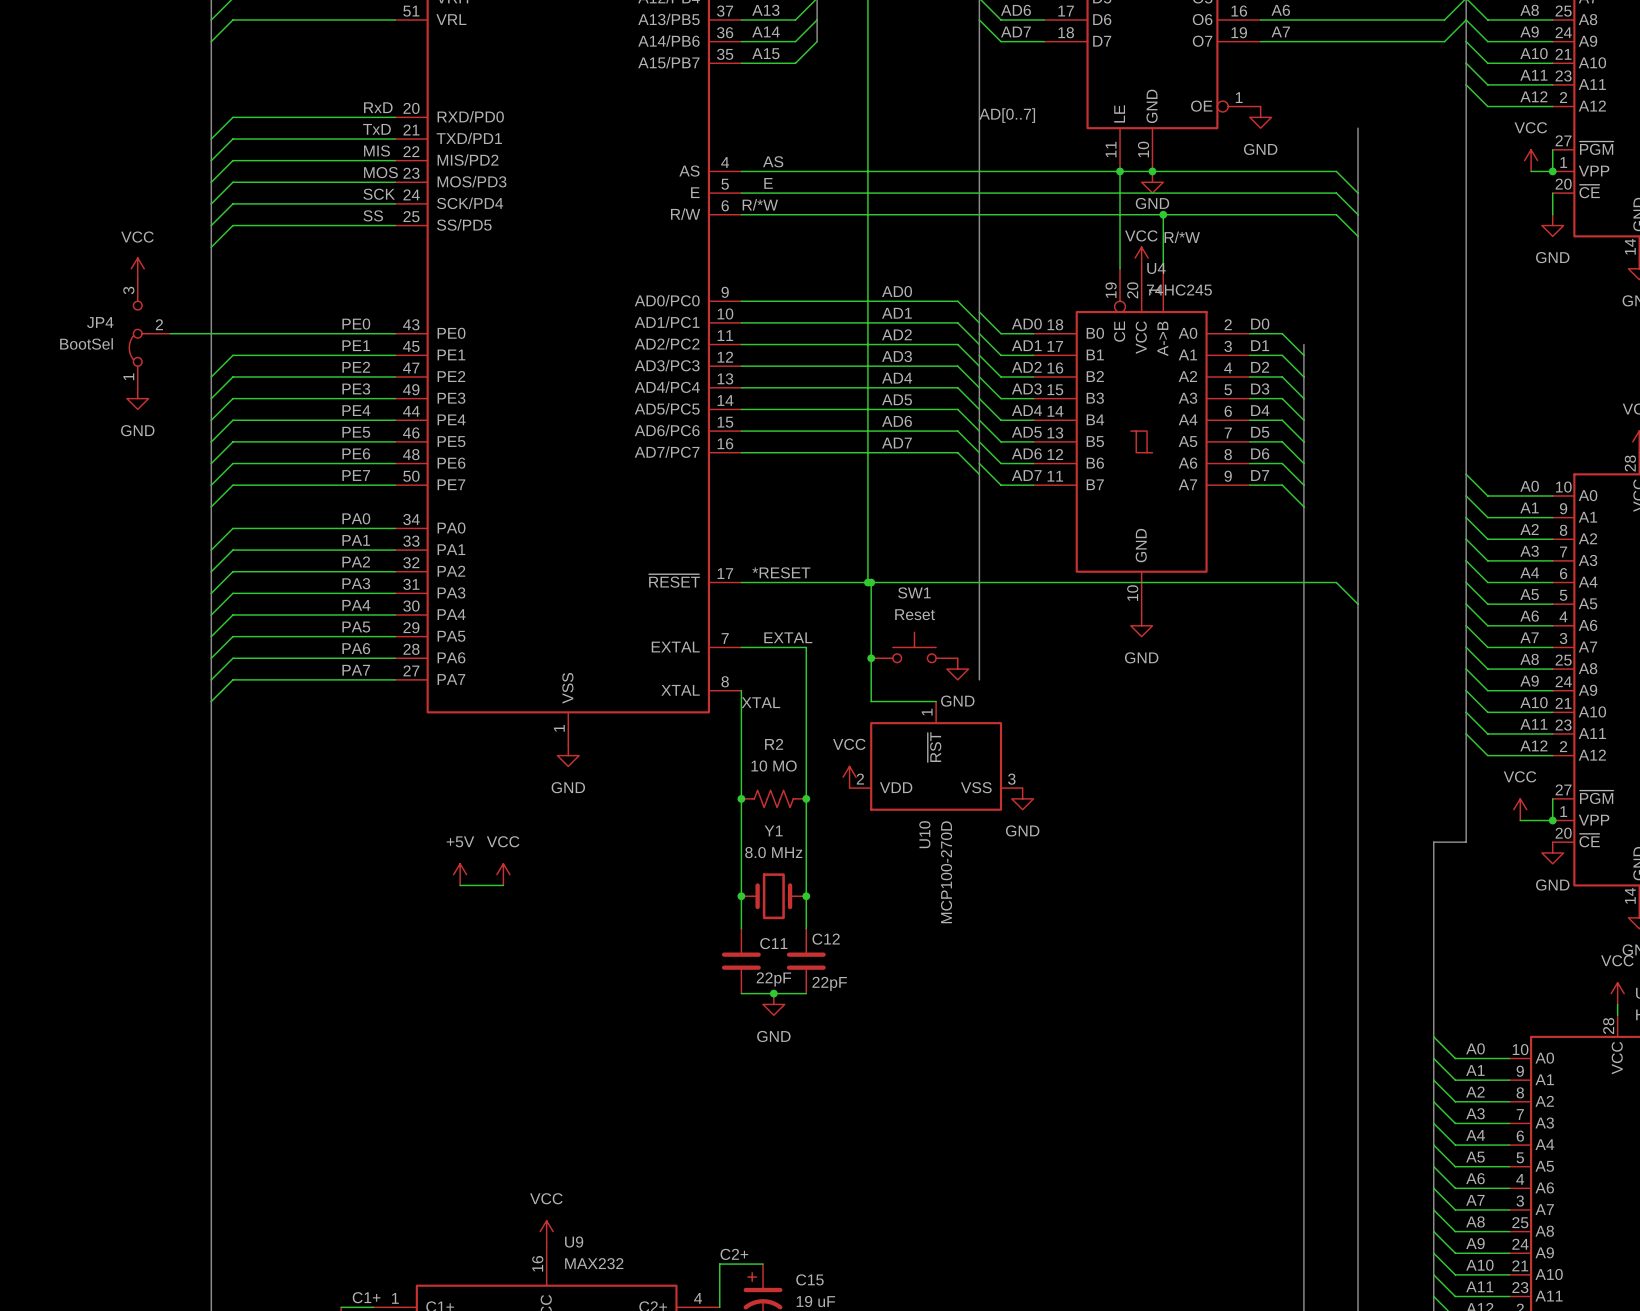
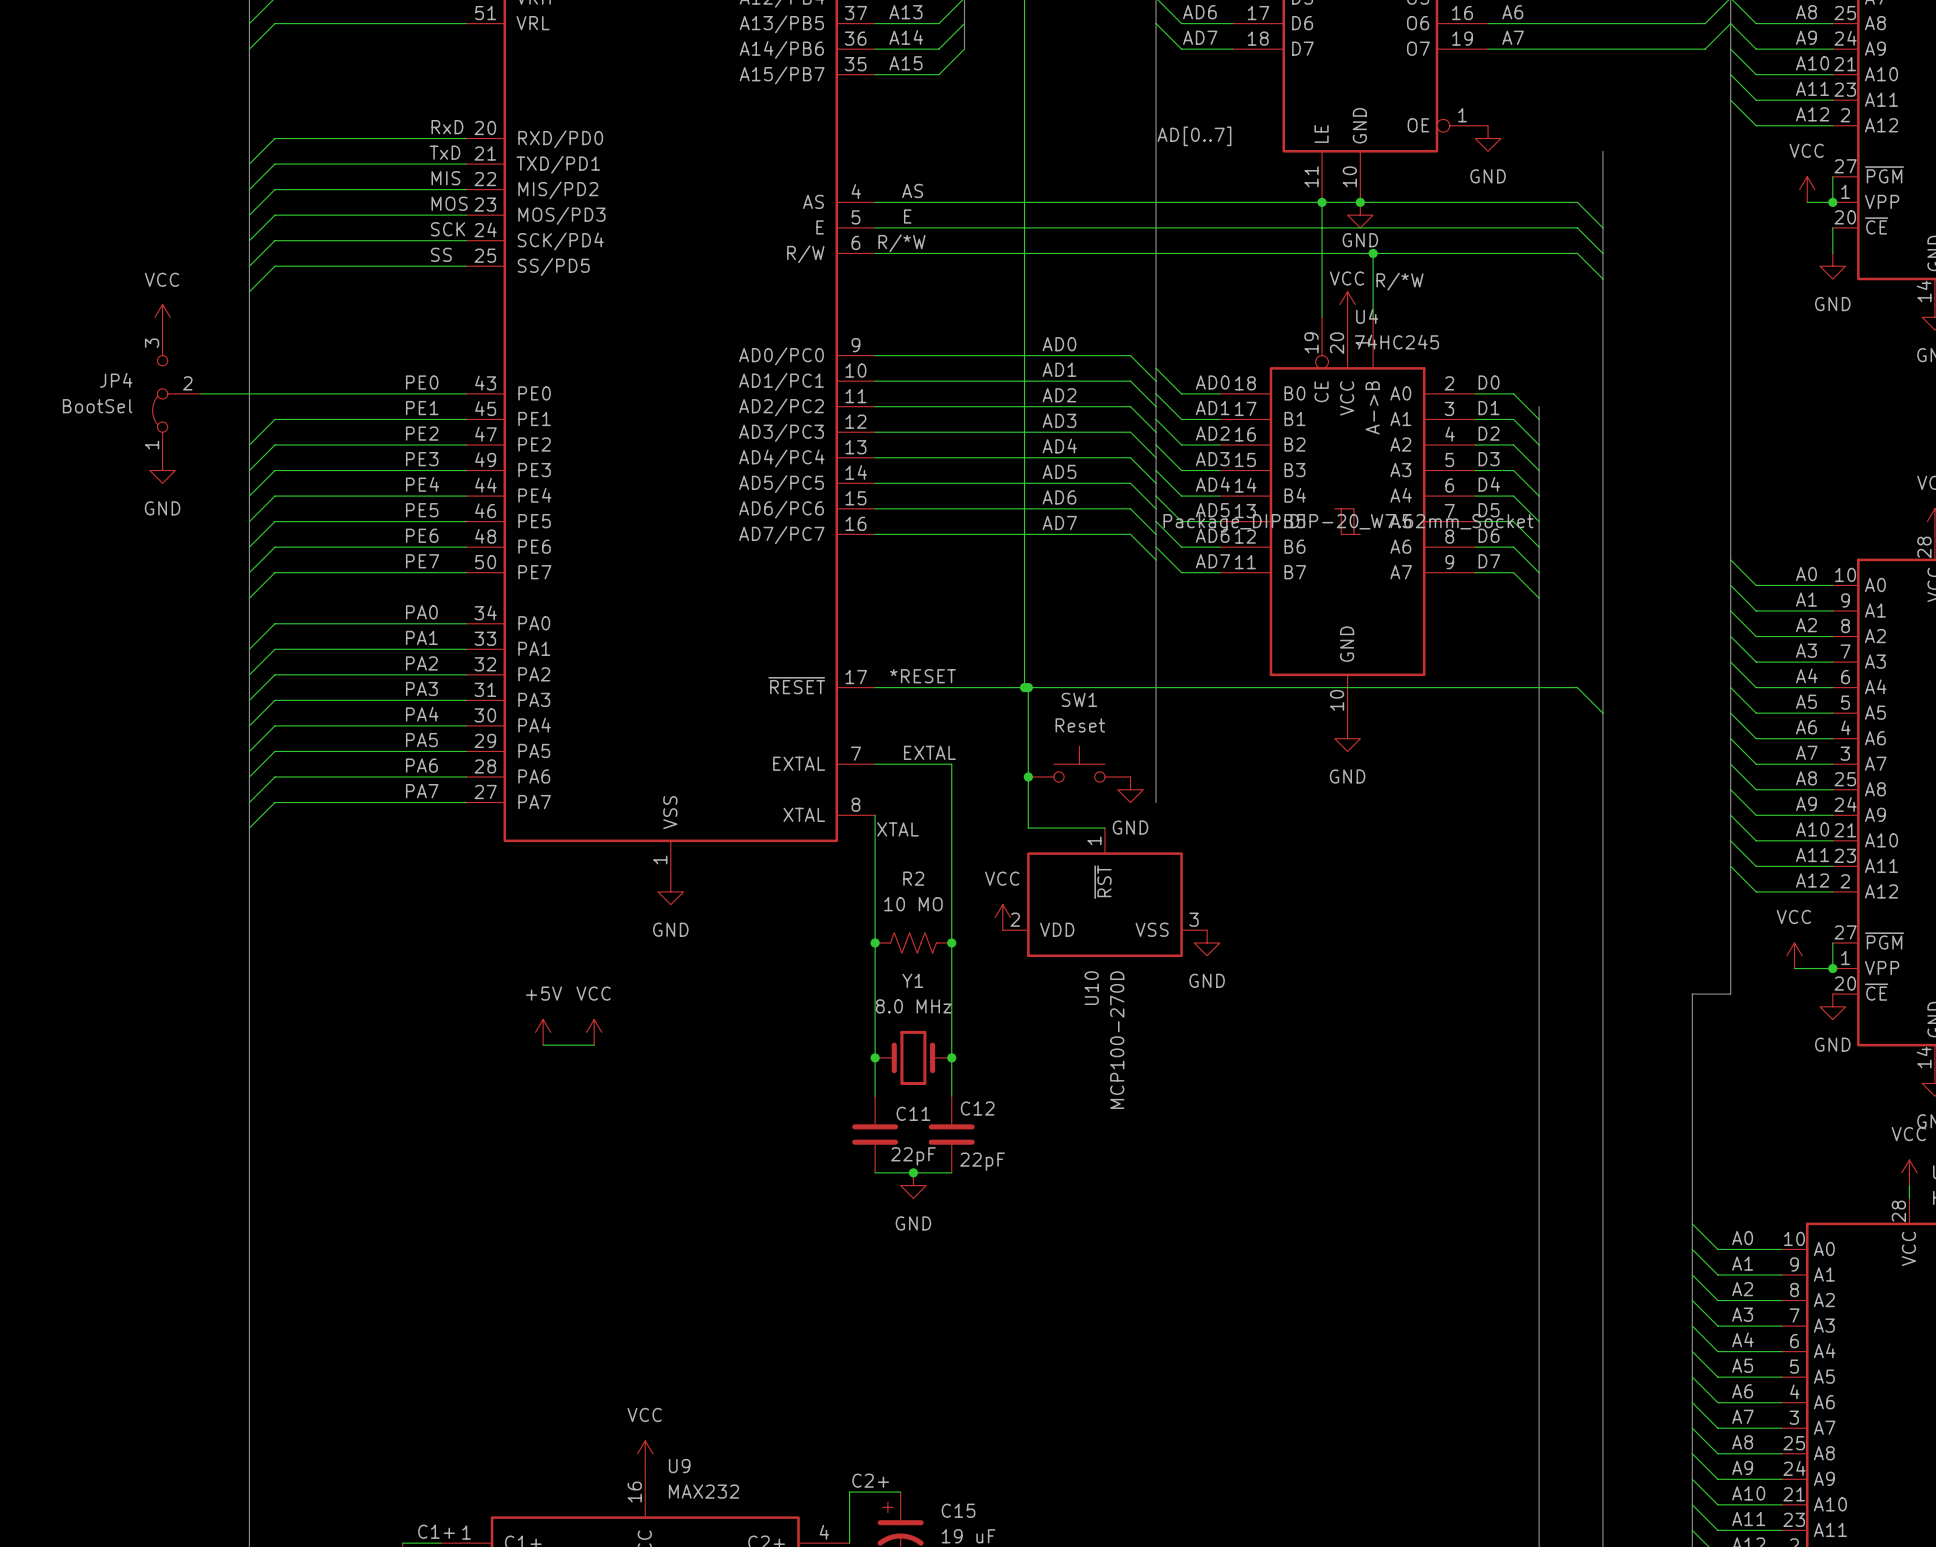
U4 text: none -> Package_DIP:DIP-20_W7.62mm_Socket (1348, 523)

